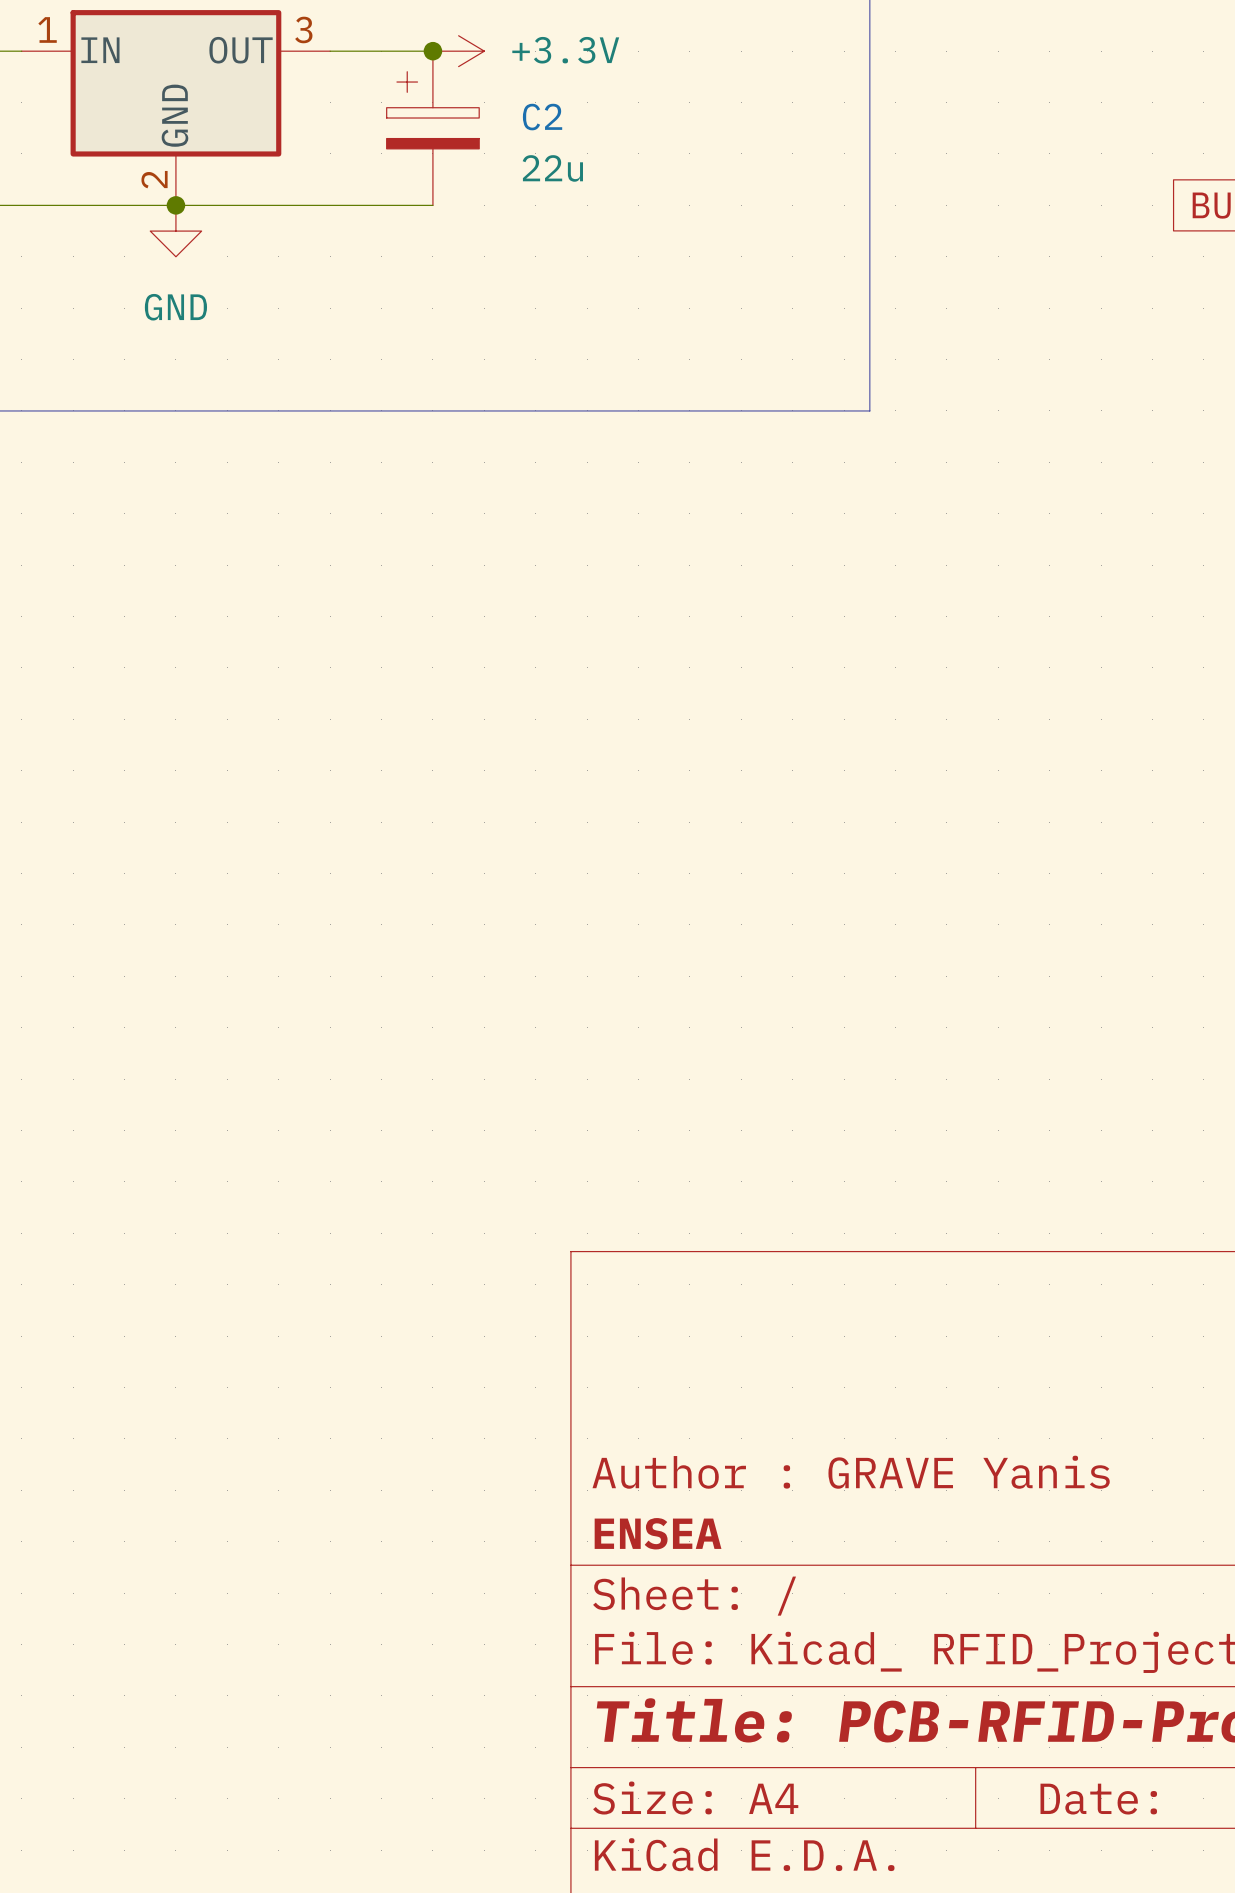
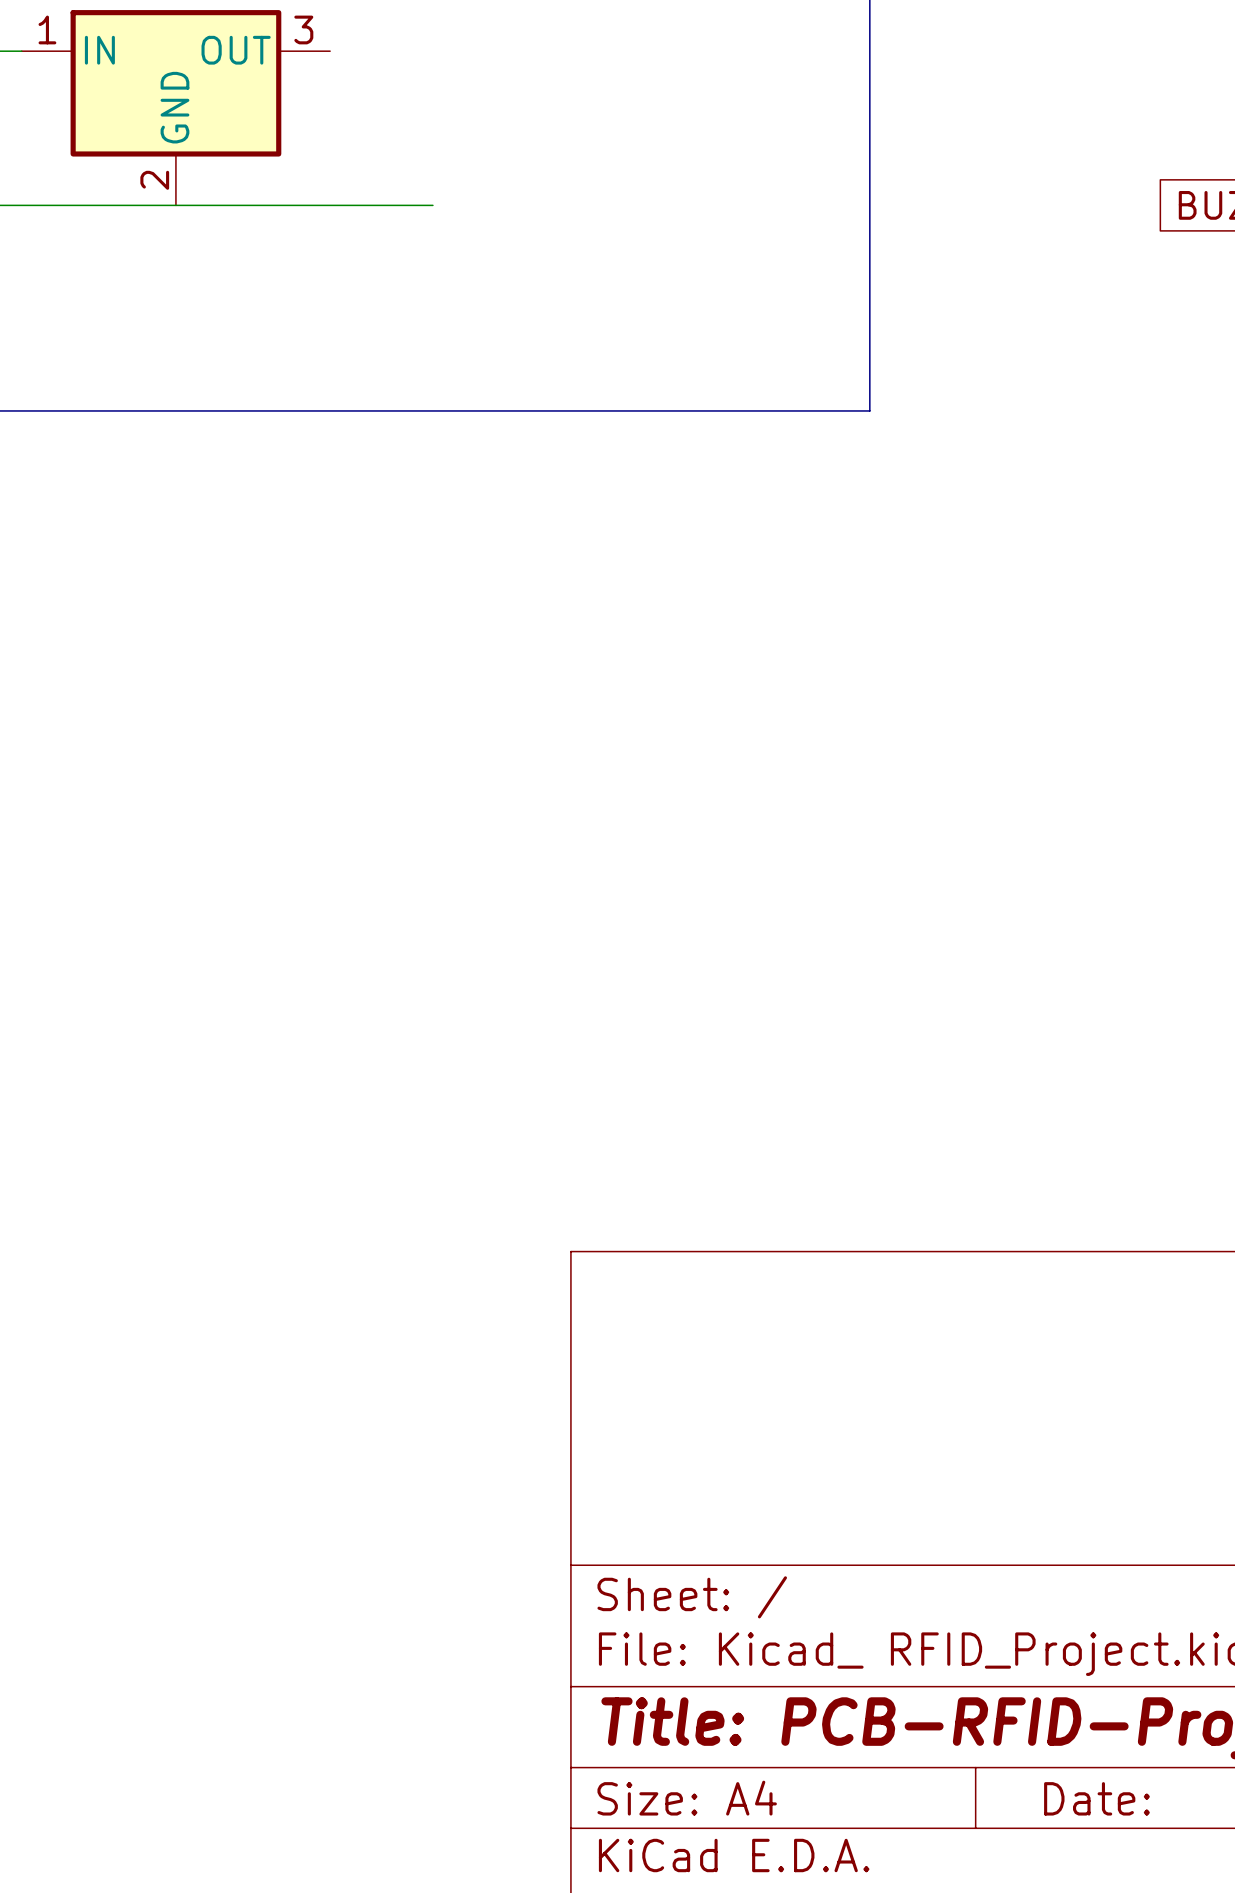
wire: (330, 51) (432, 51) -> none
junction: (432, 51) -> none
power symbol: +3.3V (458, 51) -> none
C2: 22u (432, 128) -> none
junction: (175, 205) -> none
power symbol: GND (175, 231) -> none
title block: Author : GRAVE Yanis (851, 1472) -> none
title block: ENSEA (658, 1533) -> none

